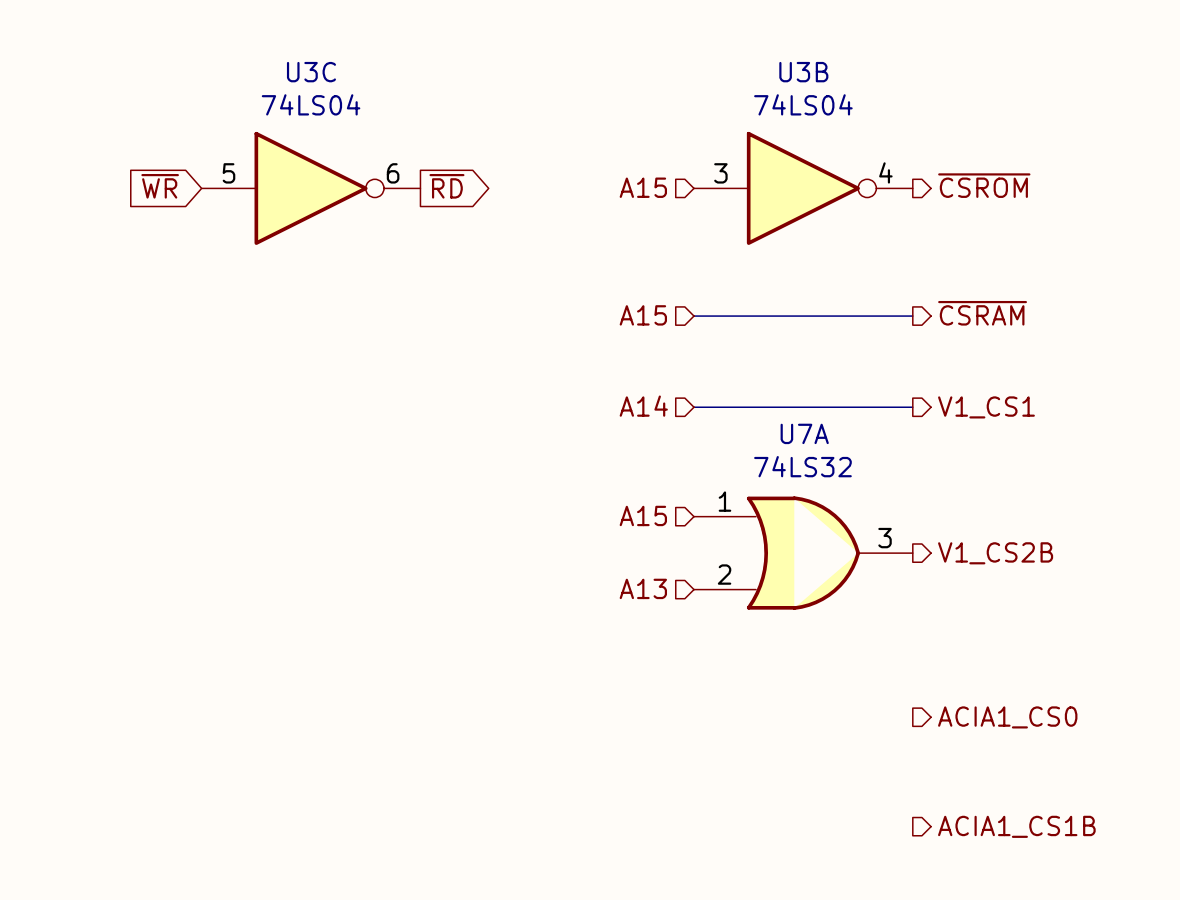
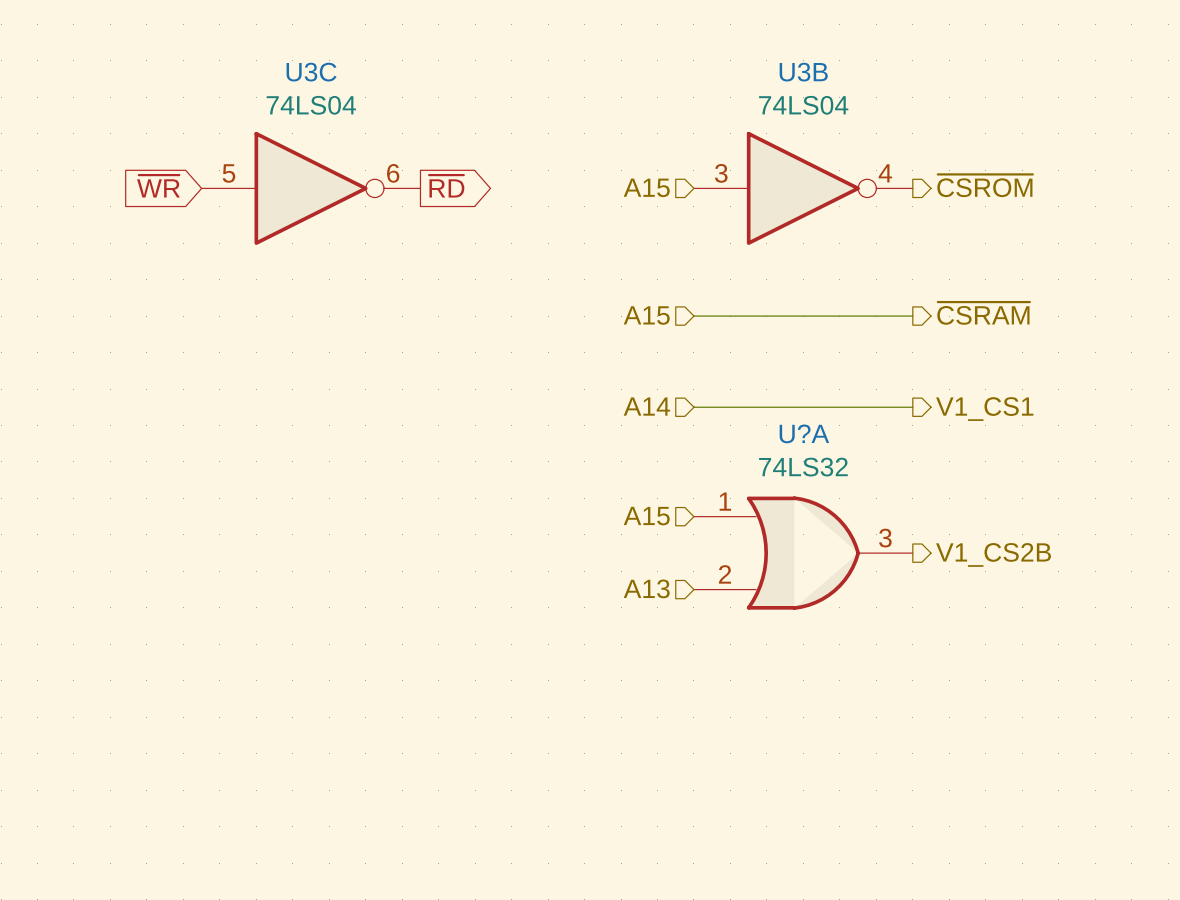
U7A name: U7A (804, 433) -> U?A (804, 433)
hierarchical label: ACIA1_CS0 (1007, 717) -> none
hierarchical label: ACIA1_CS1B (1016, 826) -> none

